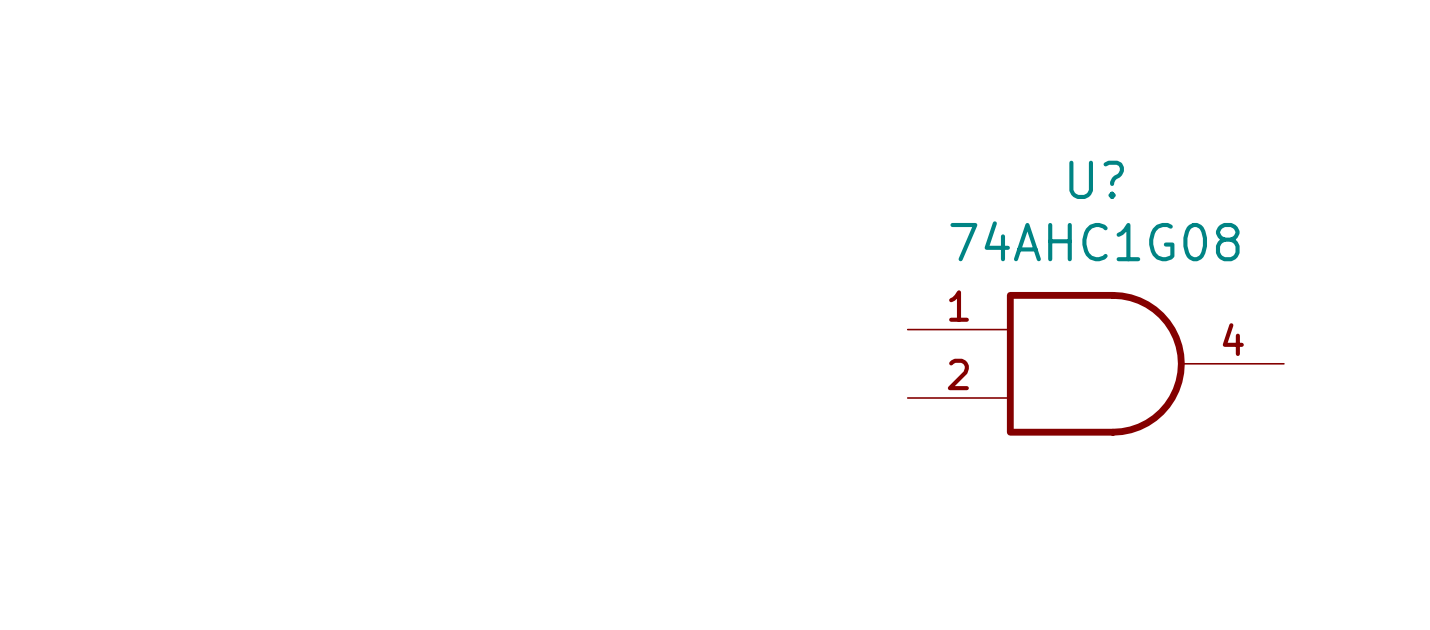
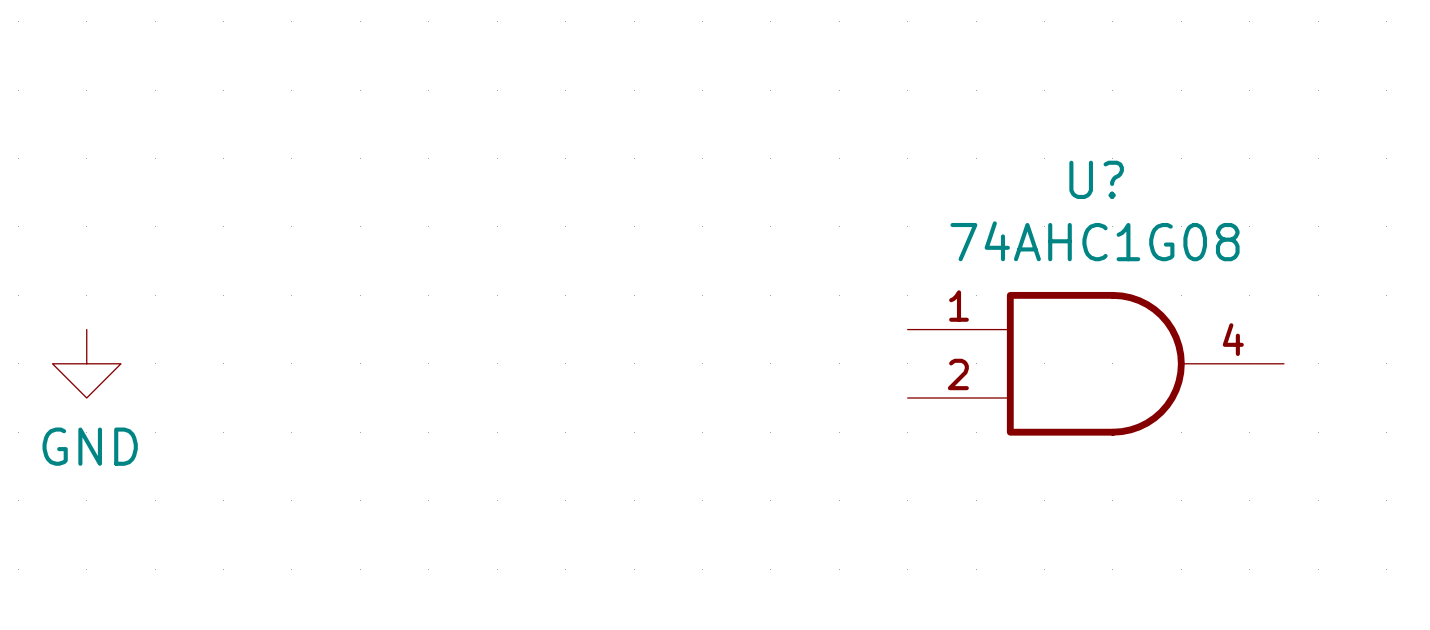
power symbol: none -> GND (86, 363)

